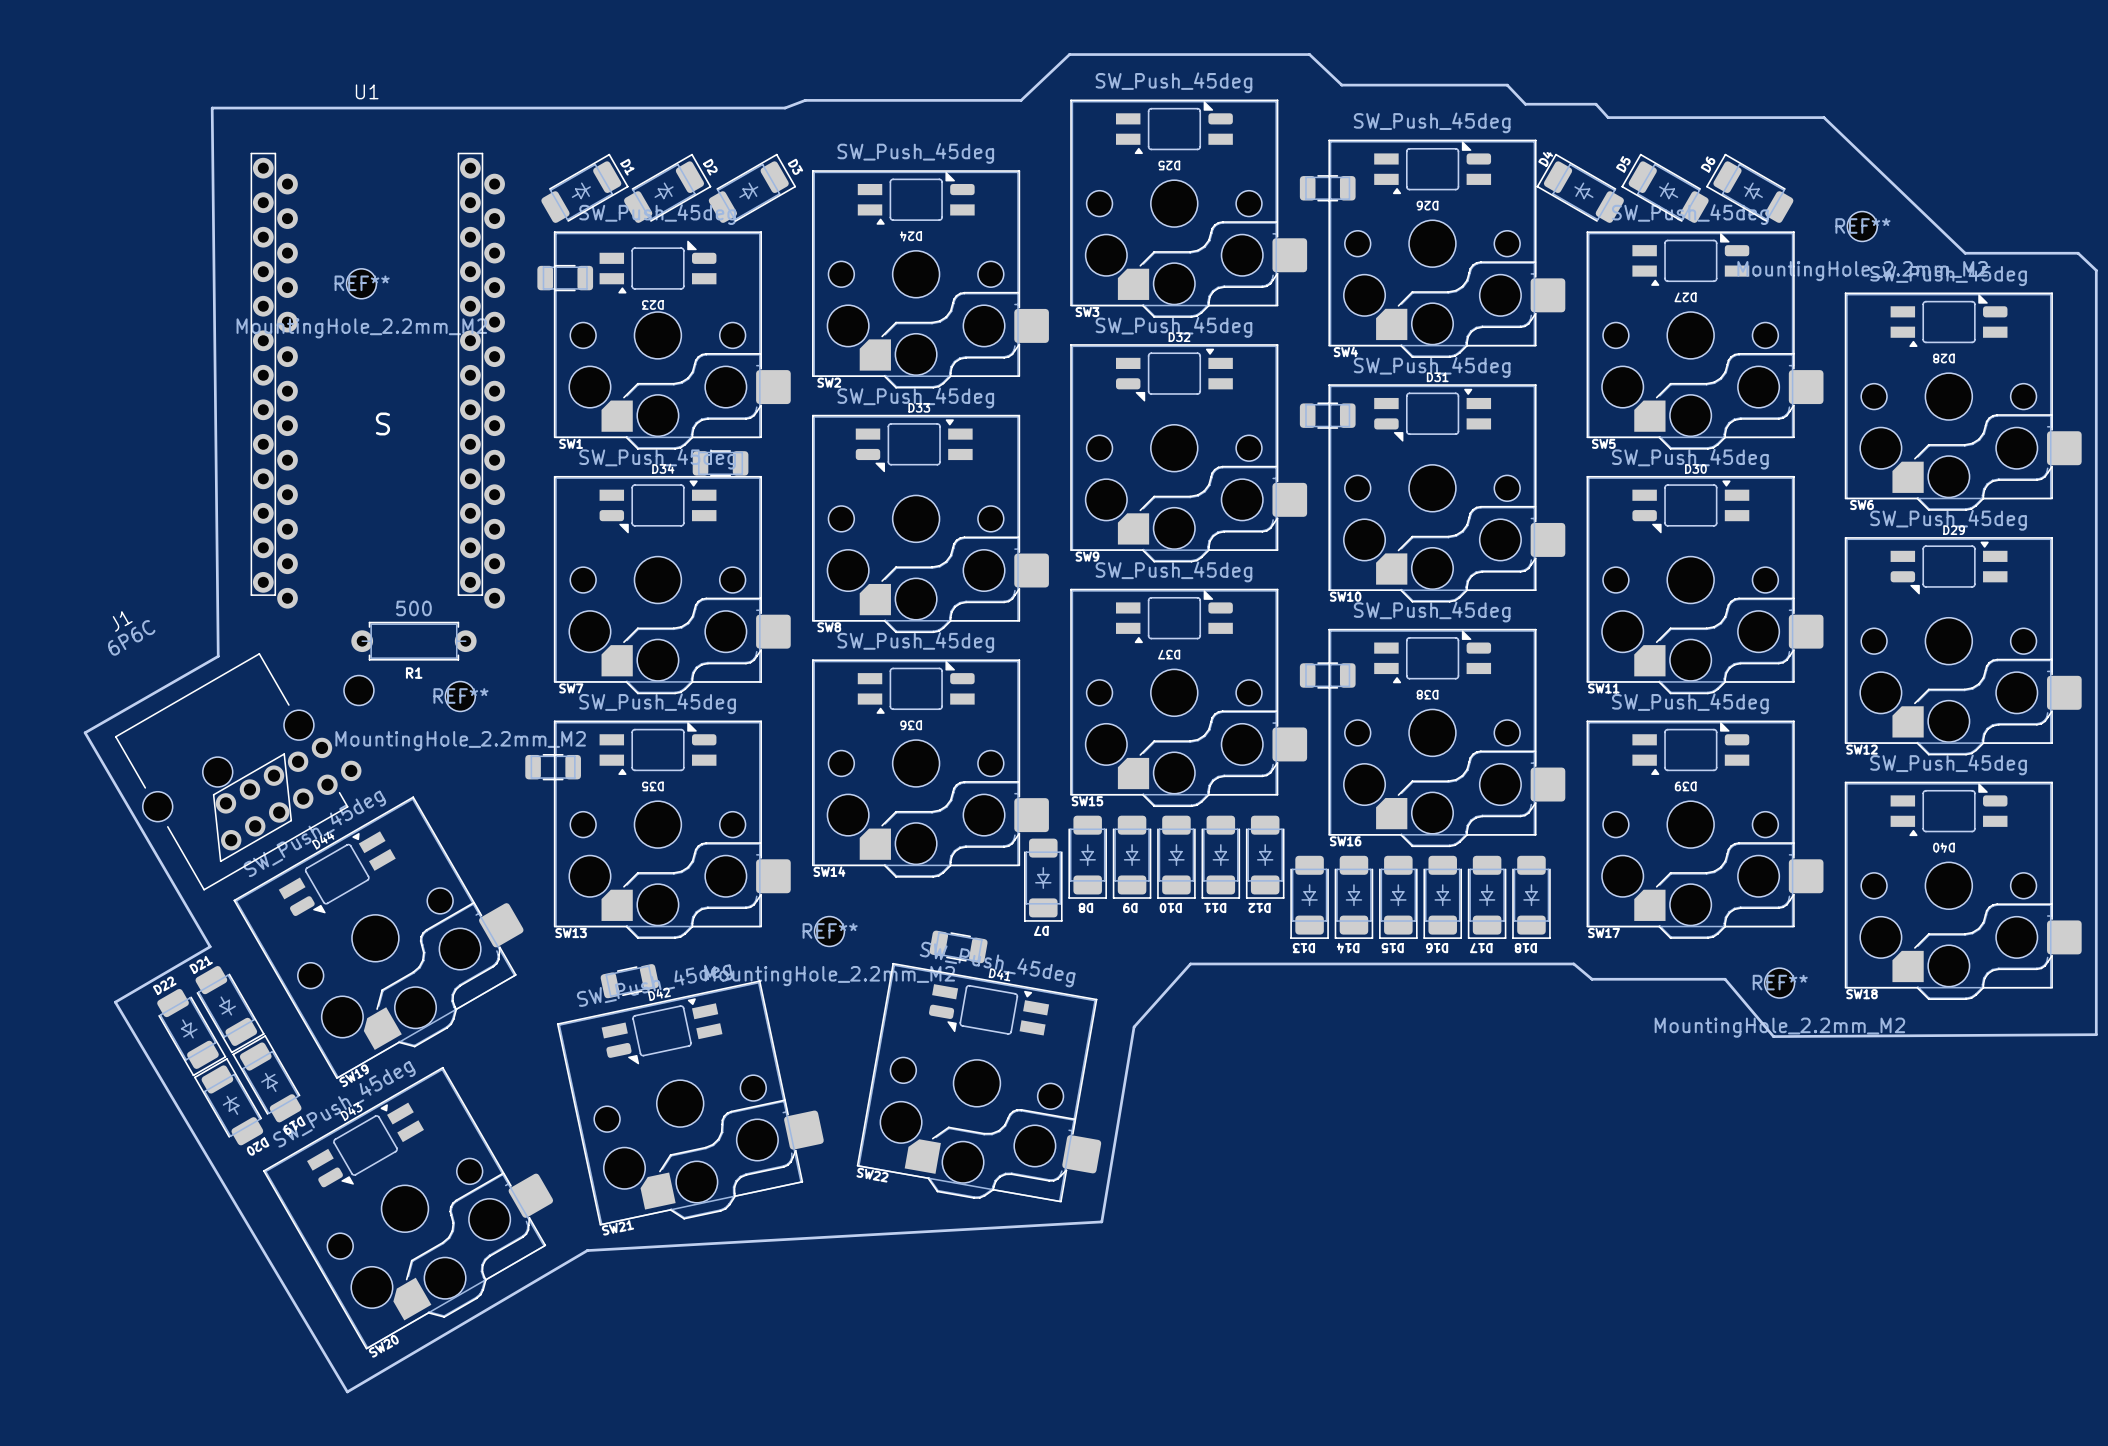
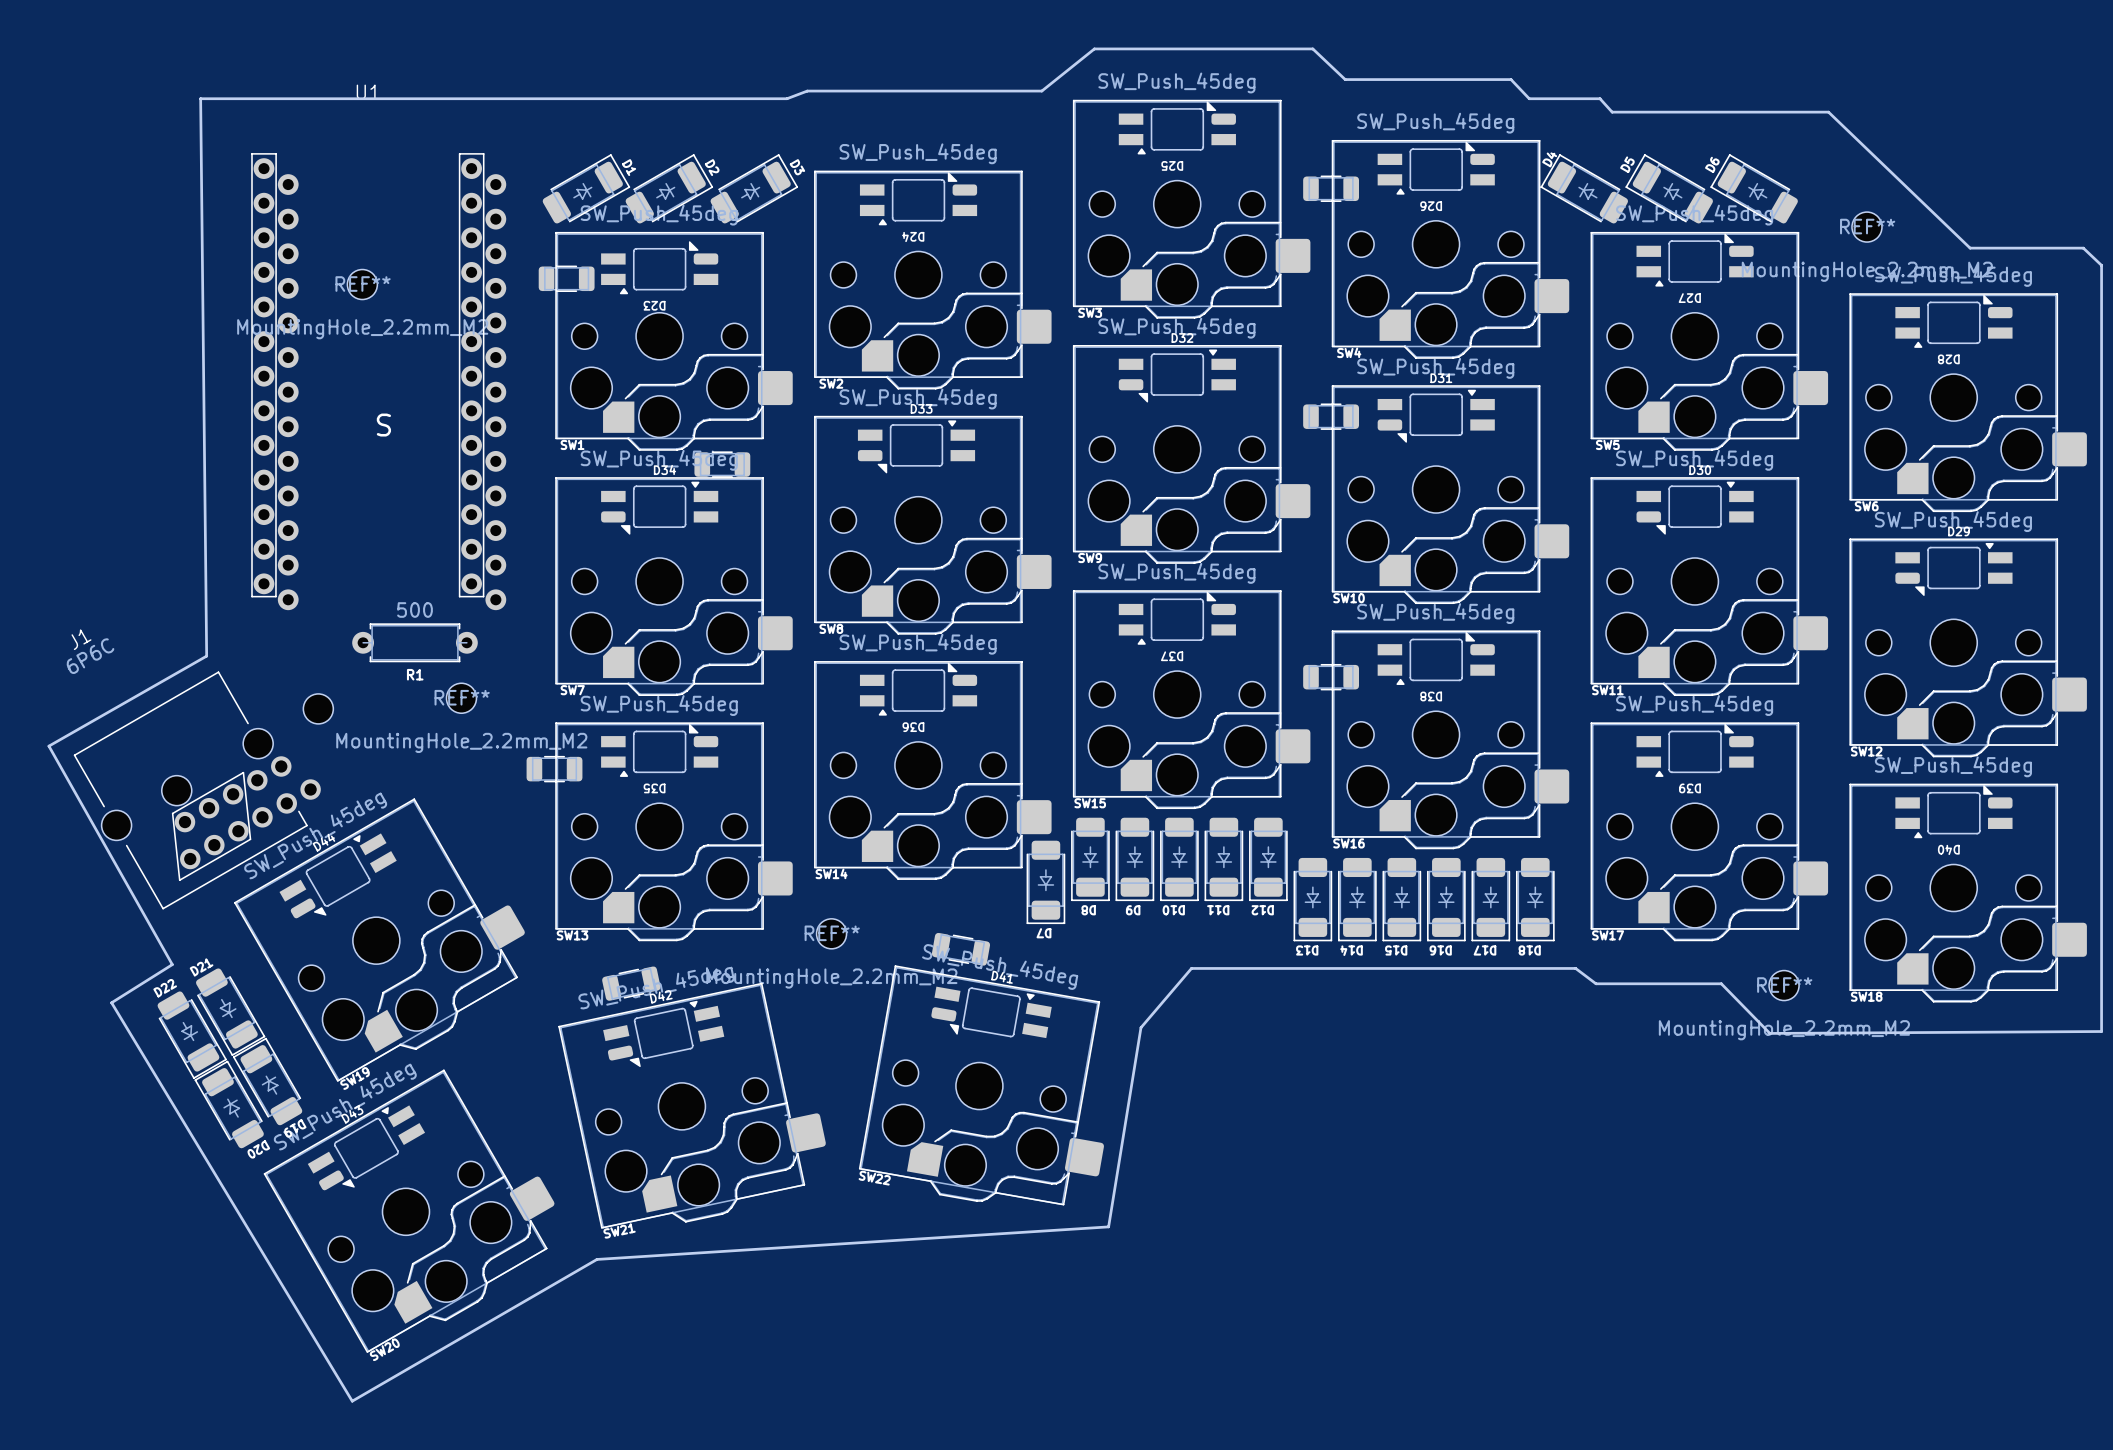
board edge: (2096, 270) (2078, 253) (1965, 253) (1823, 117) (1608, 117) (1596, 104) (1525, 104) (1507, 85) (1341, 85) (1309, 54) (1069, 54) (1021, 100) (805, 100) (785, 108) (212, 108) (218, 656) (85, 732) (210, 946) (115, 1002) (347, 1391) (587, 1250) (1101, 1221) (1134, 1027) (1190, 963) (1573, 963) (1591, 979) (1725, 979) (1773, 1036) (2096, 1034) (2096, 1028) -> (2101, 271) (2101, 265) (2083, 248) (1970, 248) (1828, 112) (1612, 112) (1600, 98) (1529, 98) (1511, 79) (1345, 79) (1312, 48) (1094, 48) (1041, 91) (807, 91) (787, 98) (200, 98) (206, 656) (48, 746) (172, 964) (111, 1002) (352, 1401) (596, 1259) (1108, 1226) (1140, 1027) (1191, 968) (1575, 968) (1595, 983) (1721, 983) (1769, 1033) (2101, 1031)
J1 position: (244, 771) -> (203, 790)

